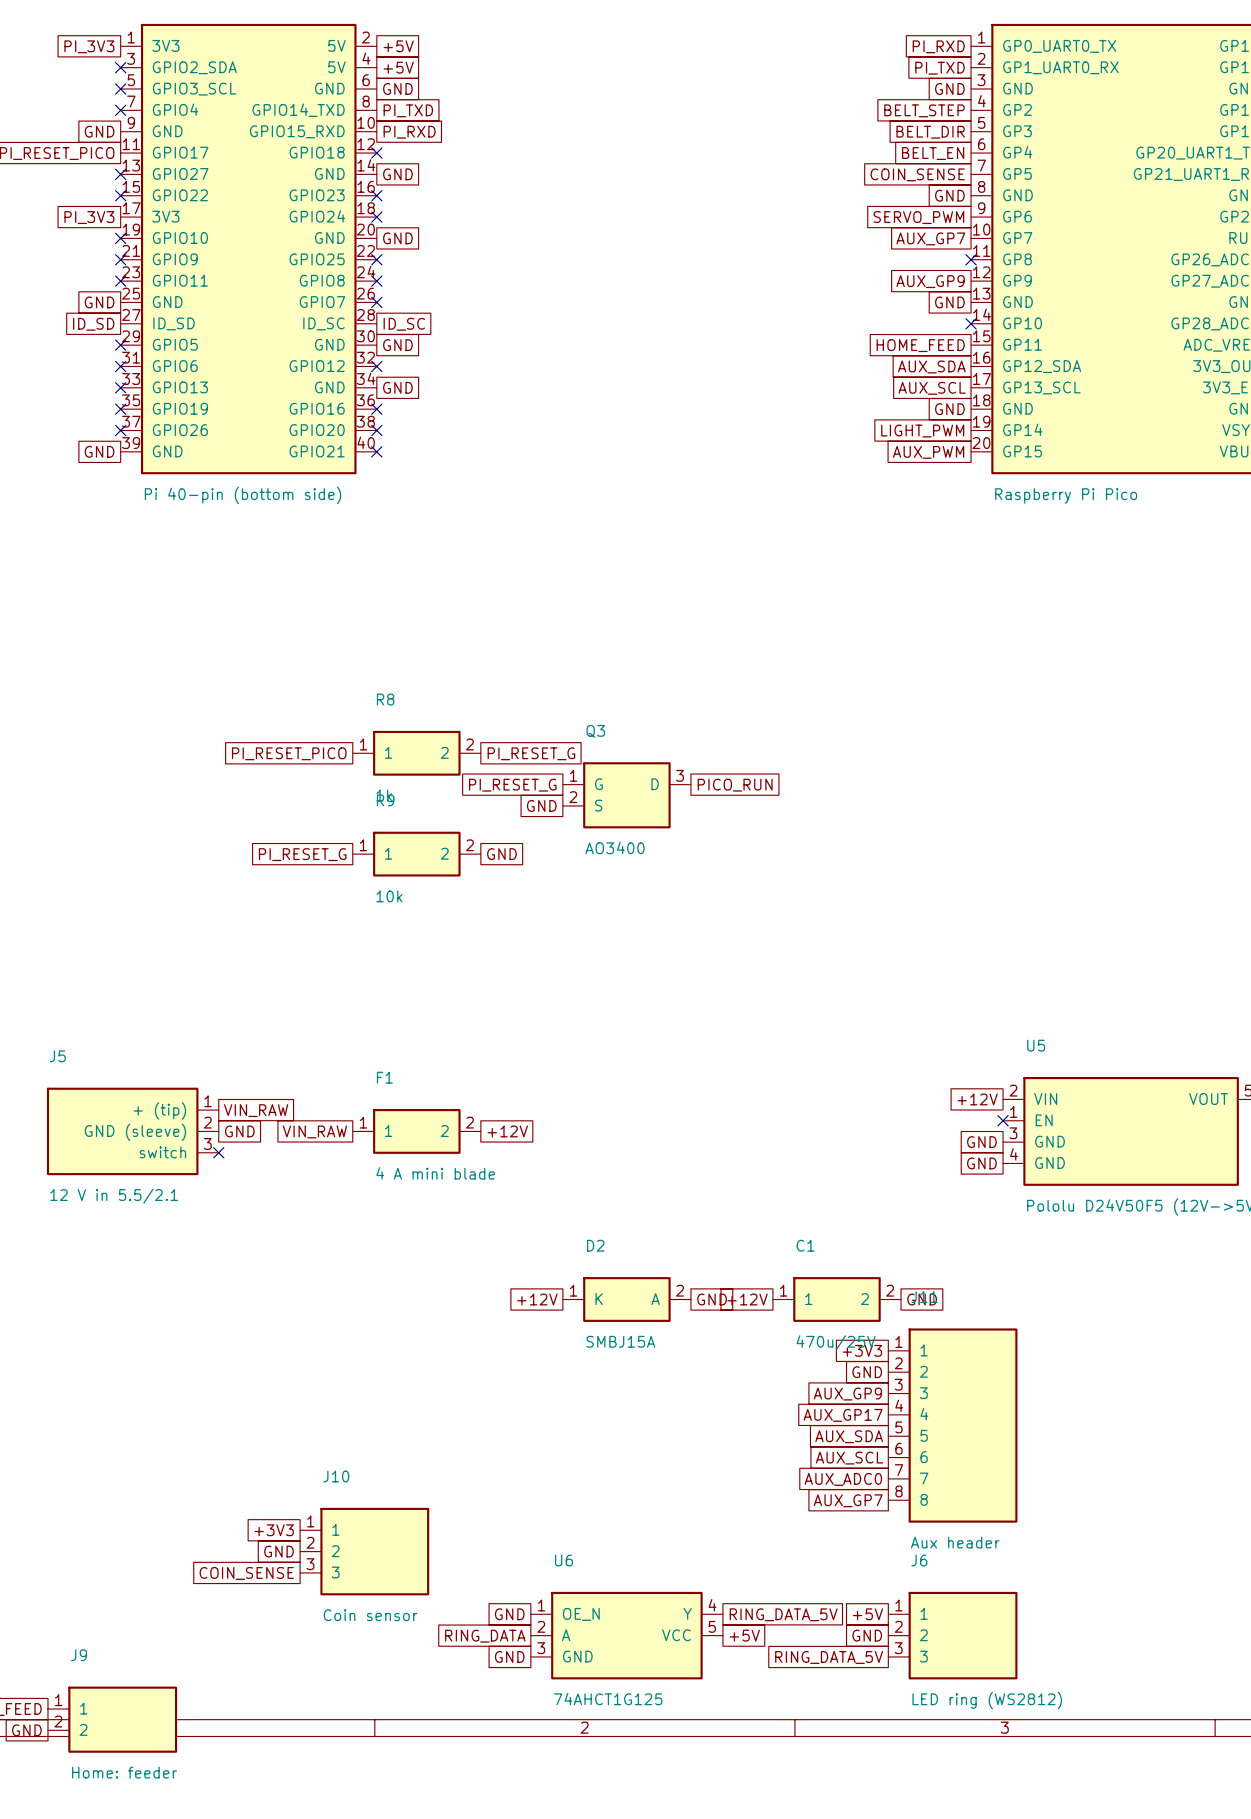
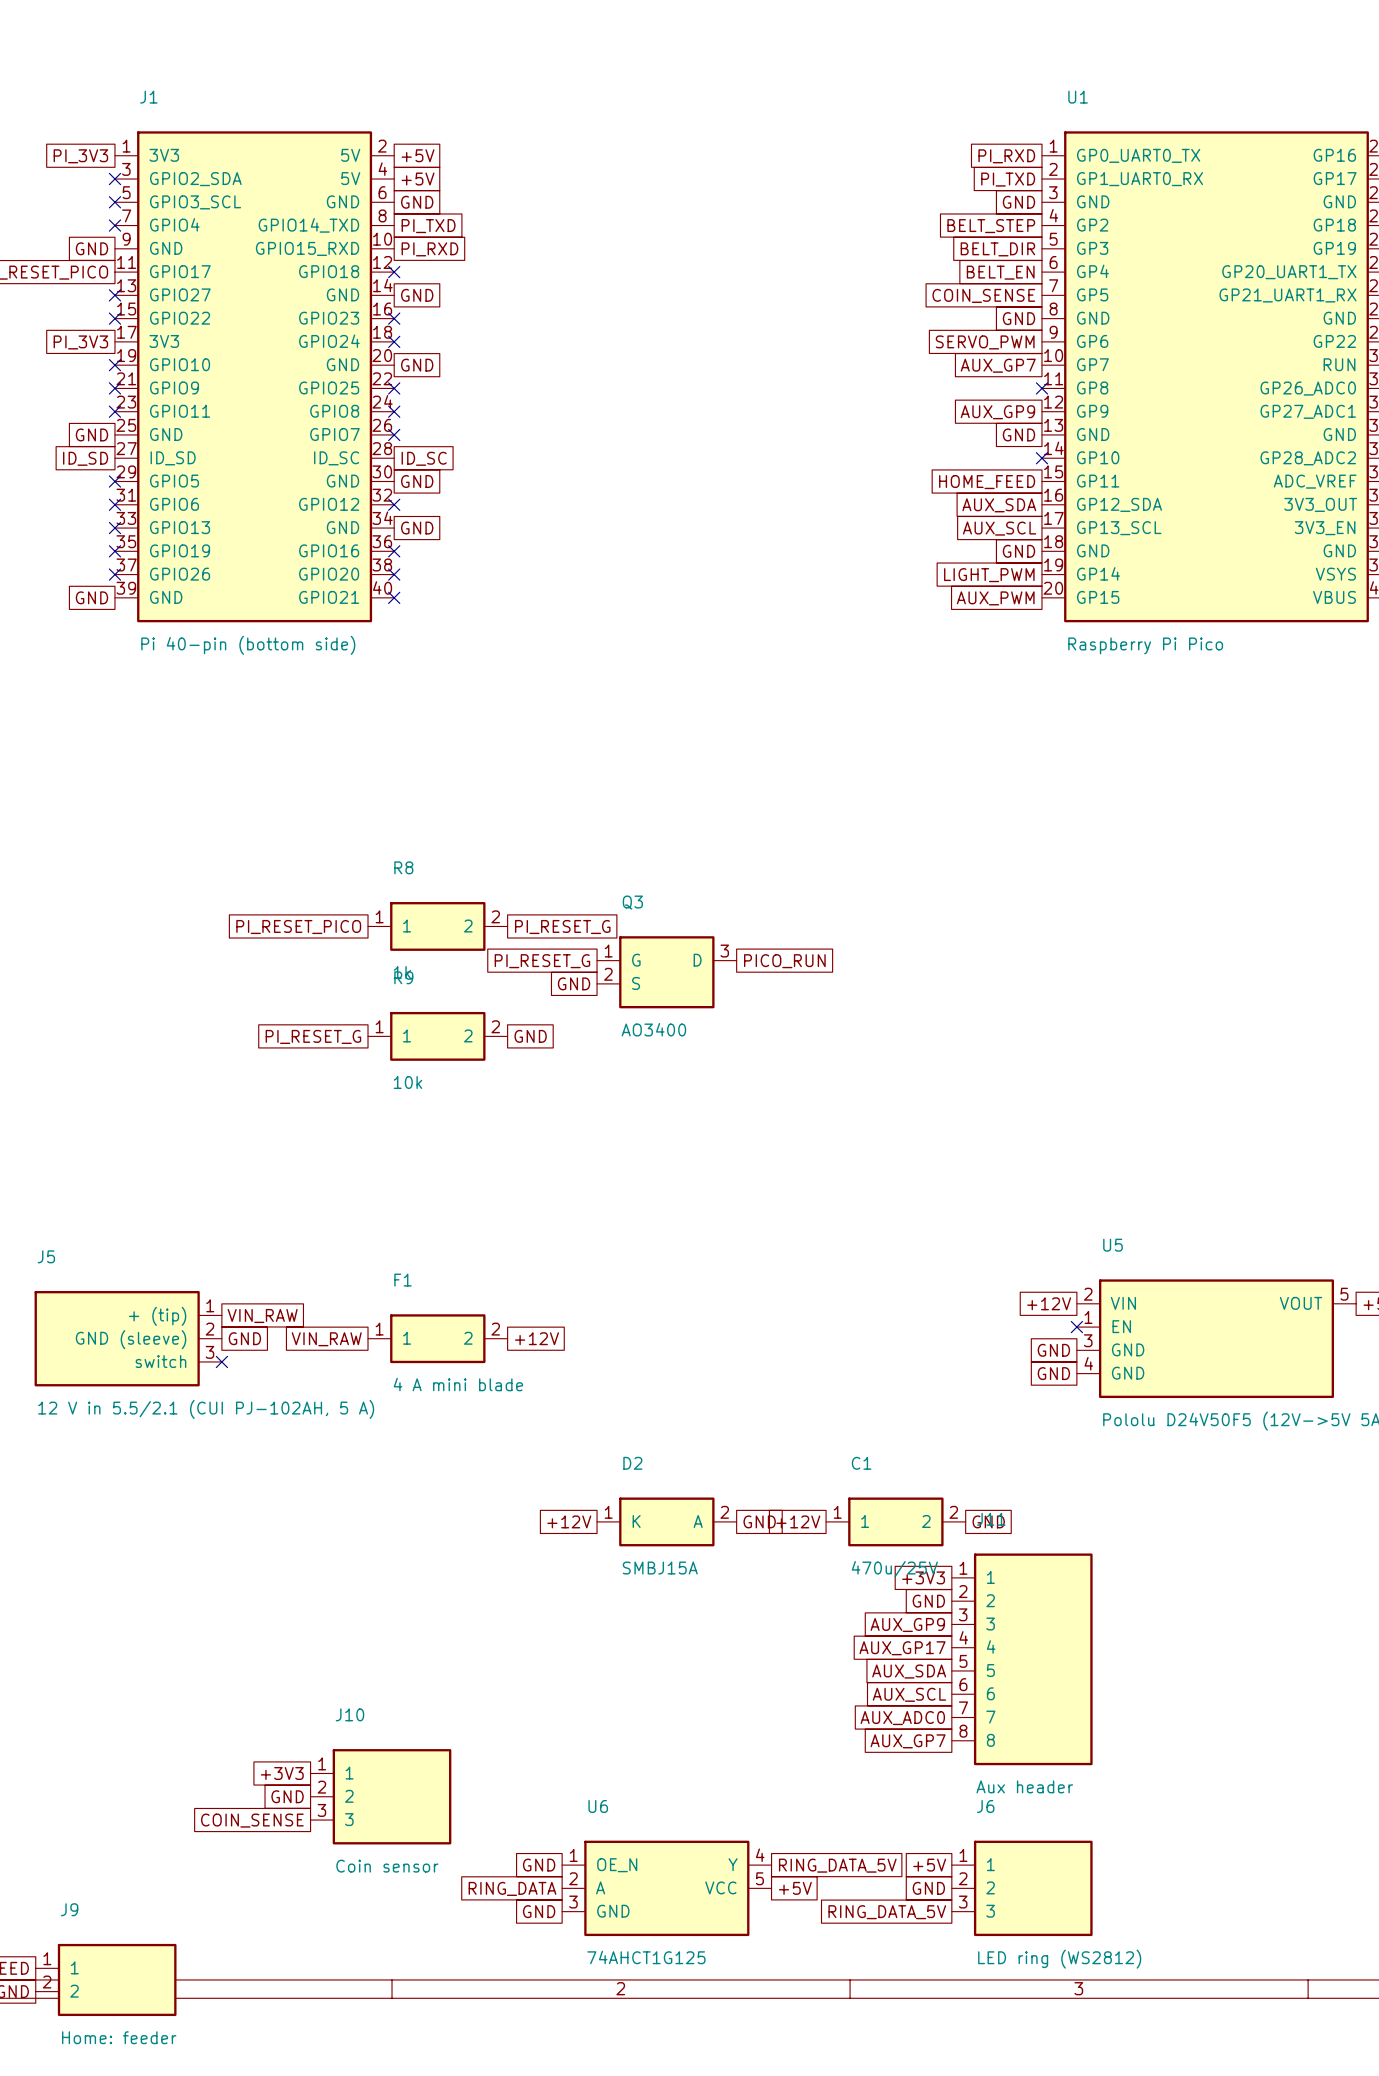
J5 value: 12 V in 5.5/2.1 (114, 1196) -> 12 V in 5.5/2.1 (CUI PJ-102AH, 5 A) (206, 1409)

